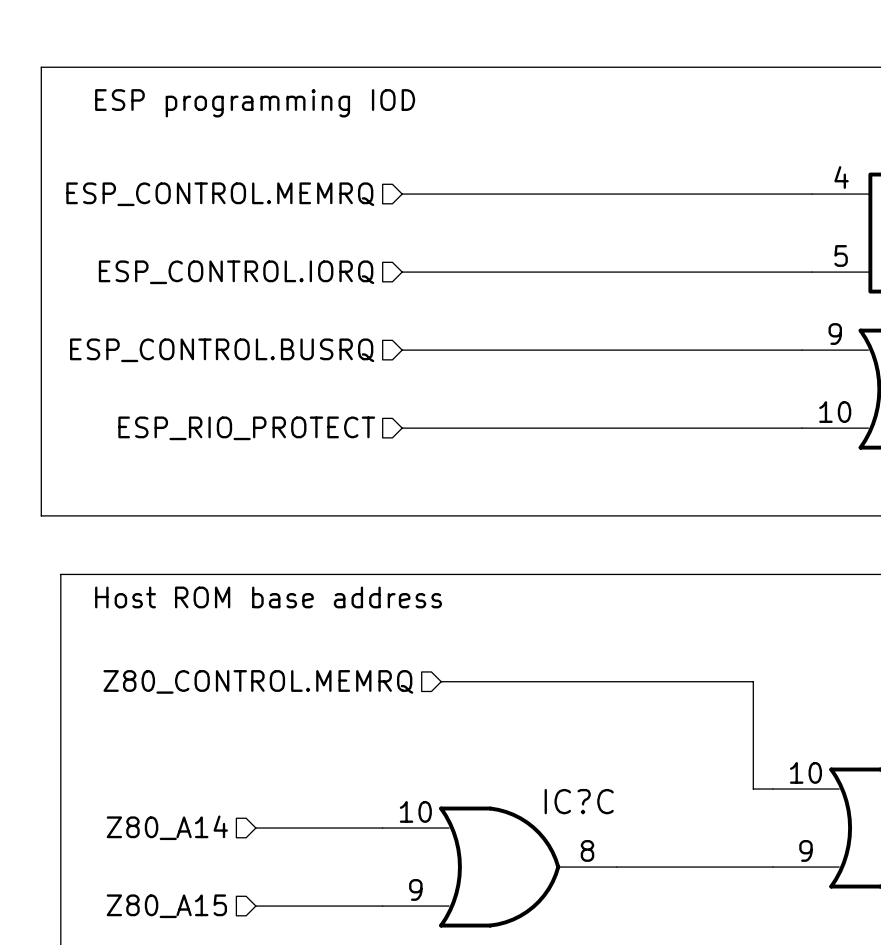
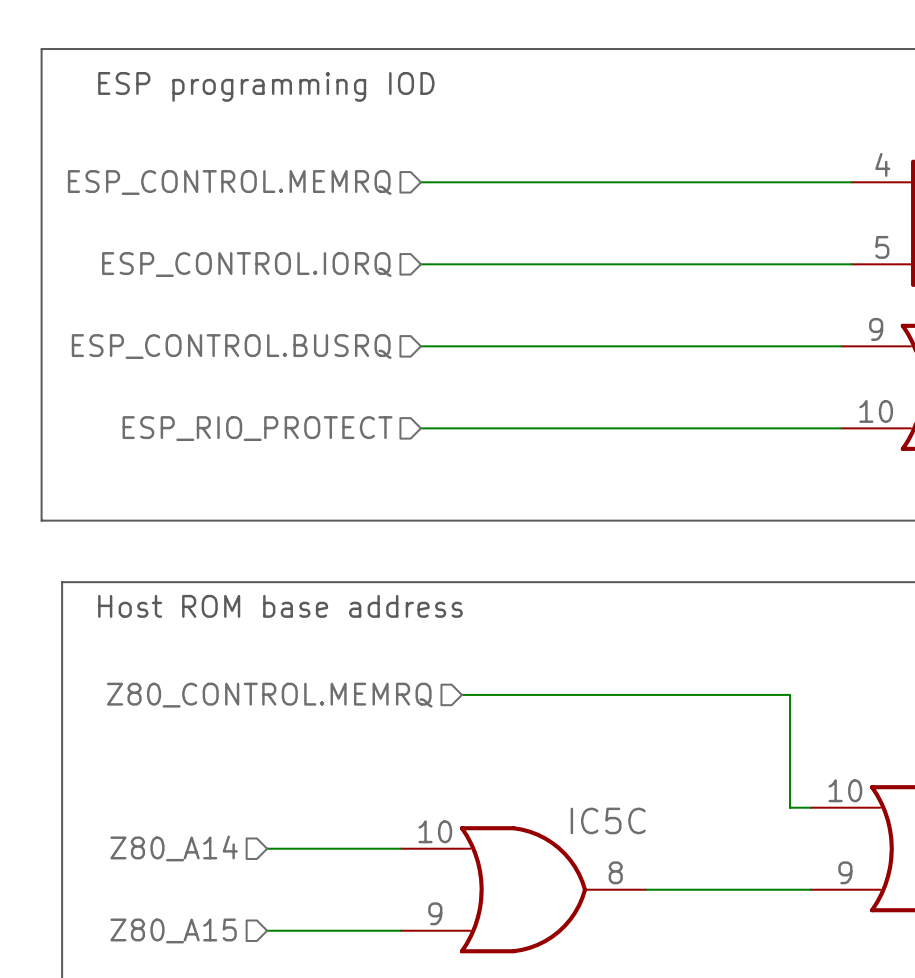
IC?C name: IC?C (579, 801) -> IC5C (608, 820)

